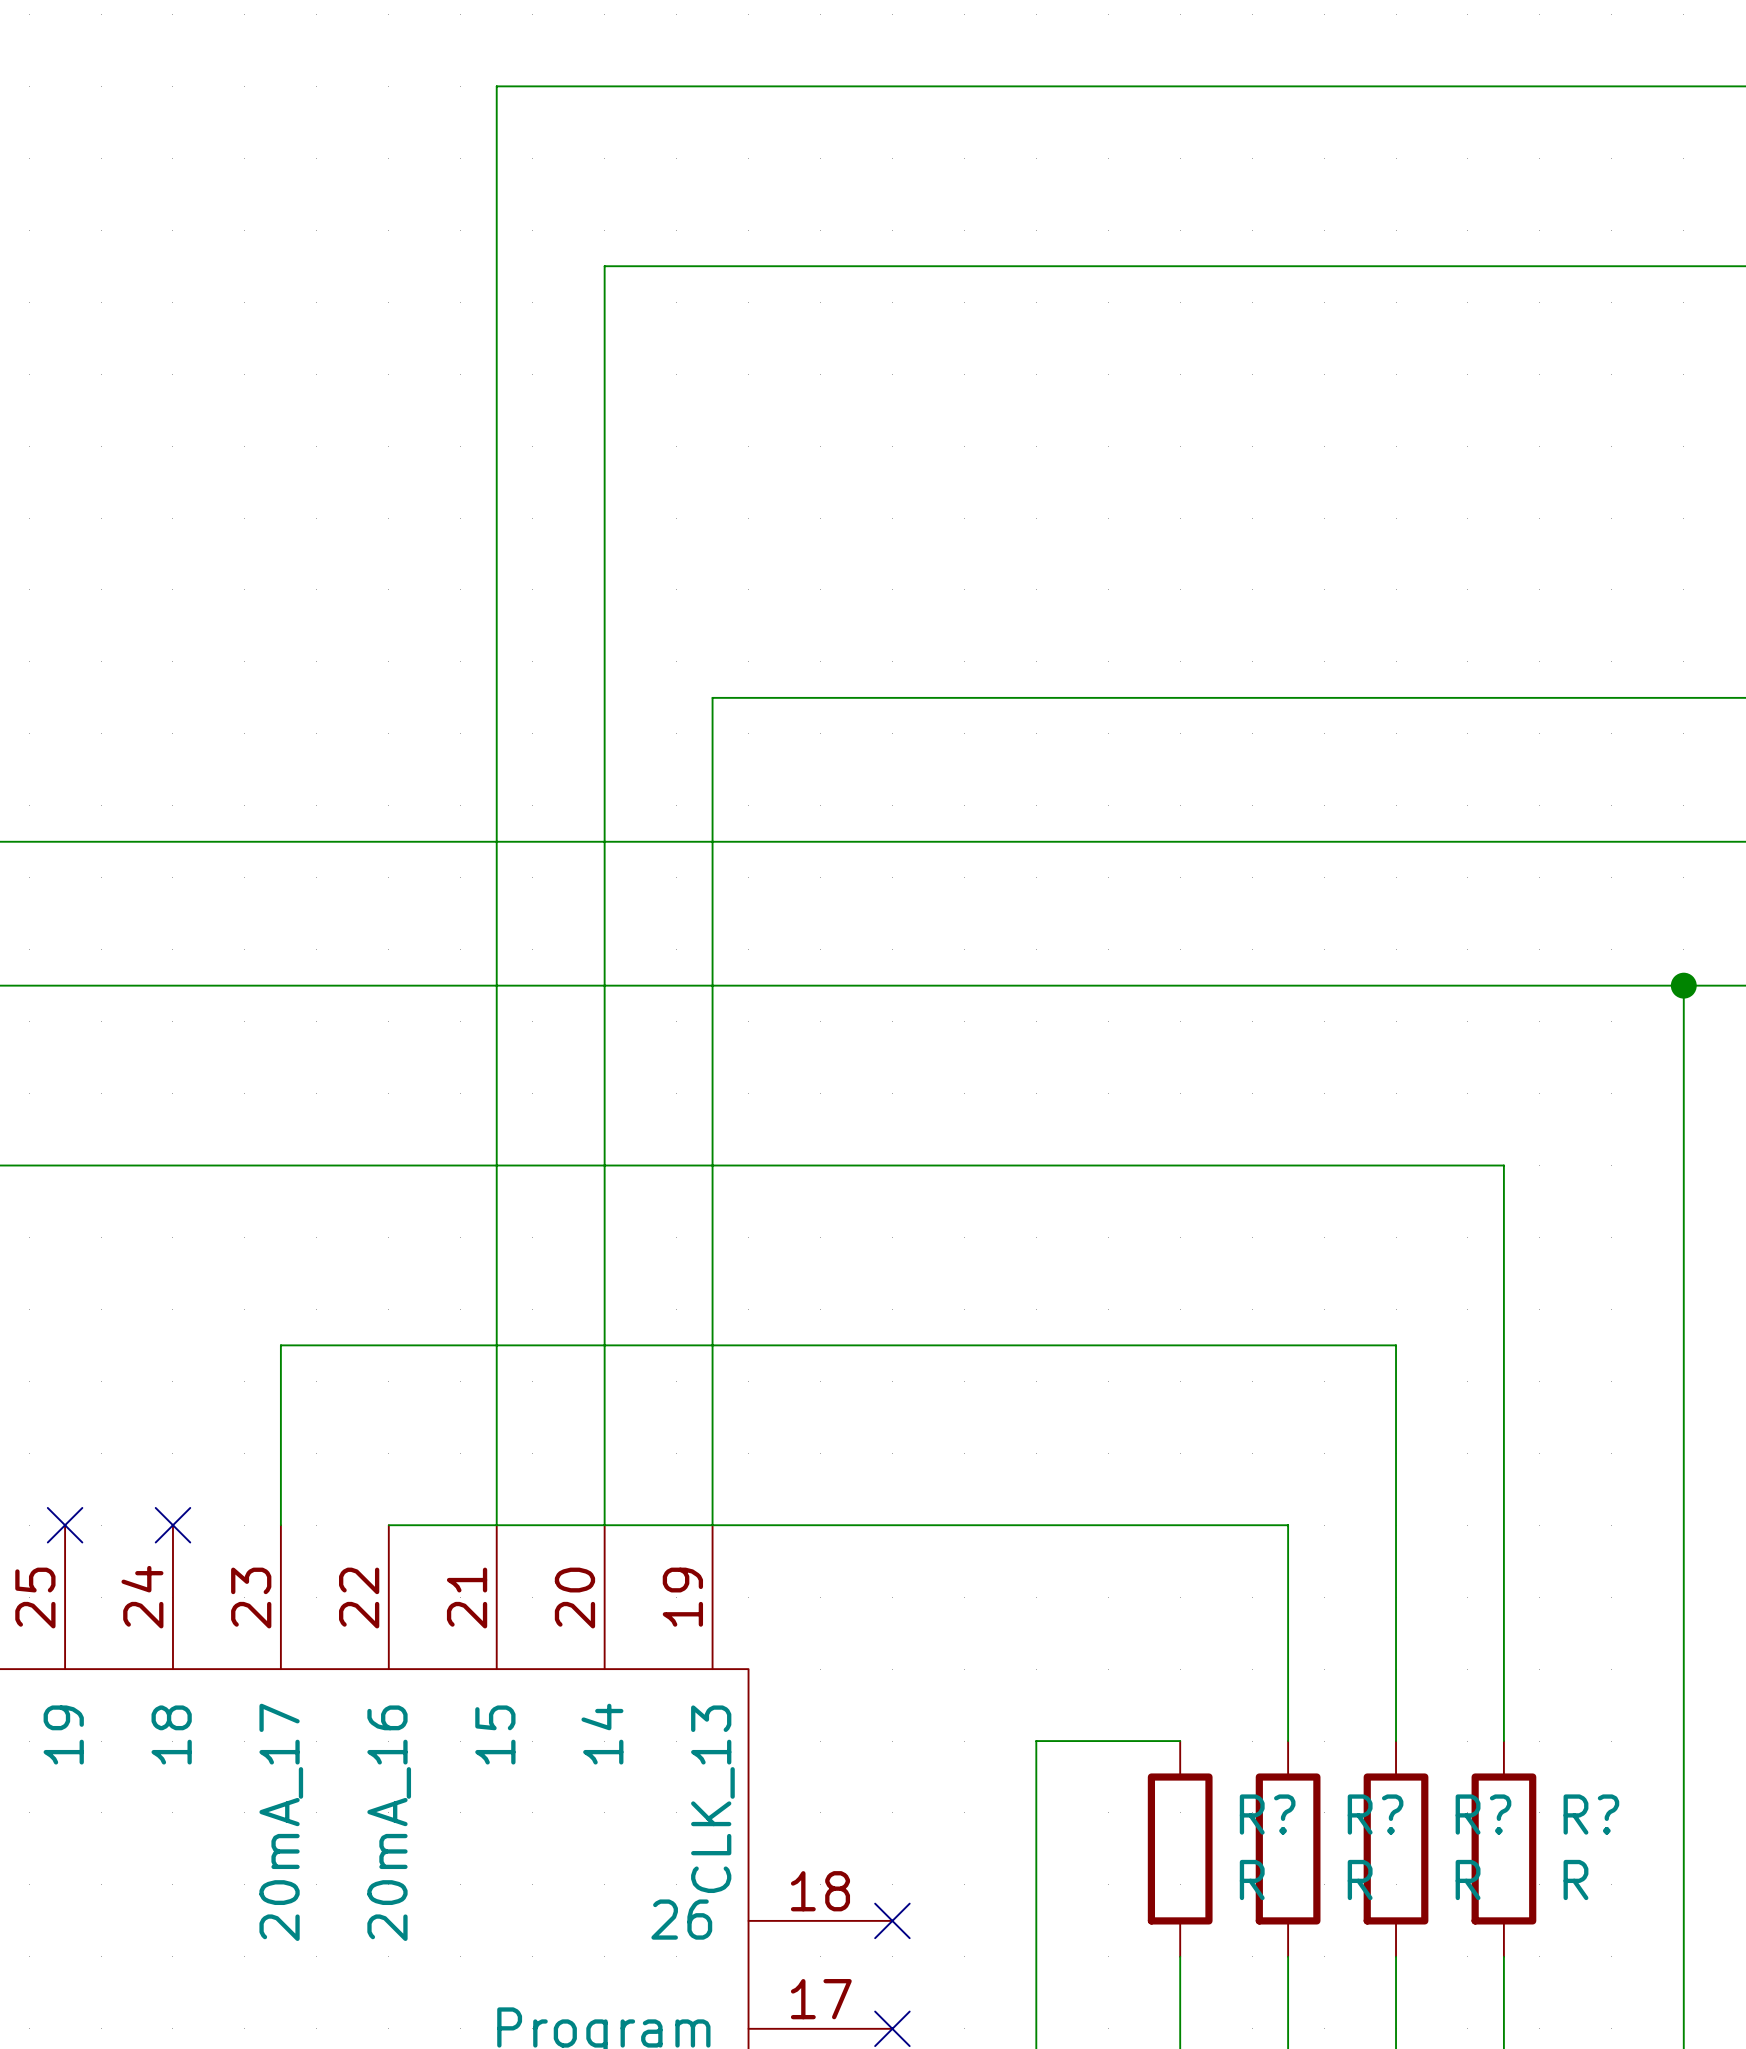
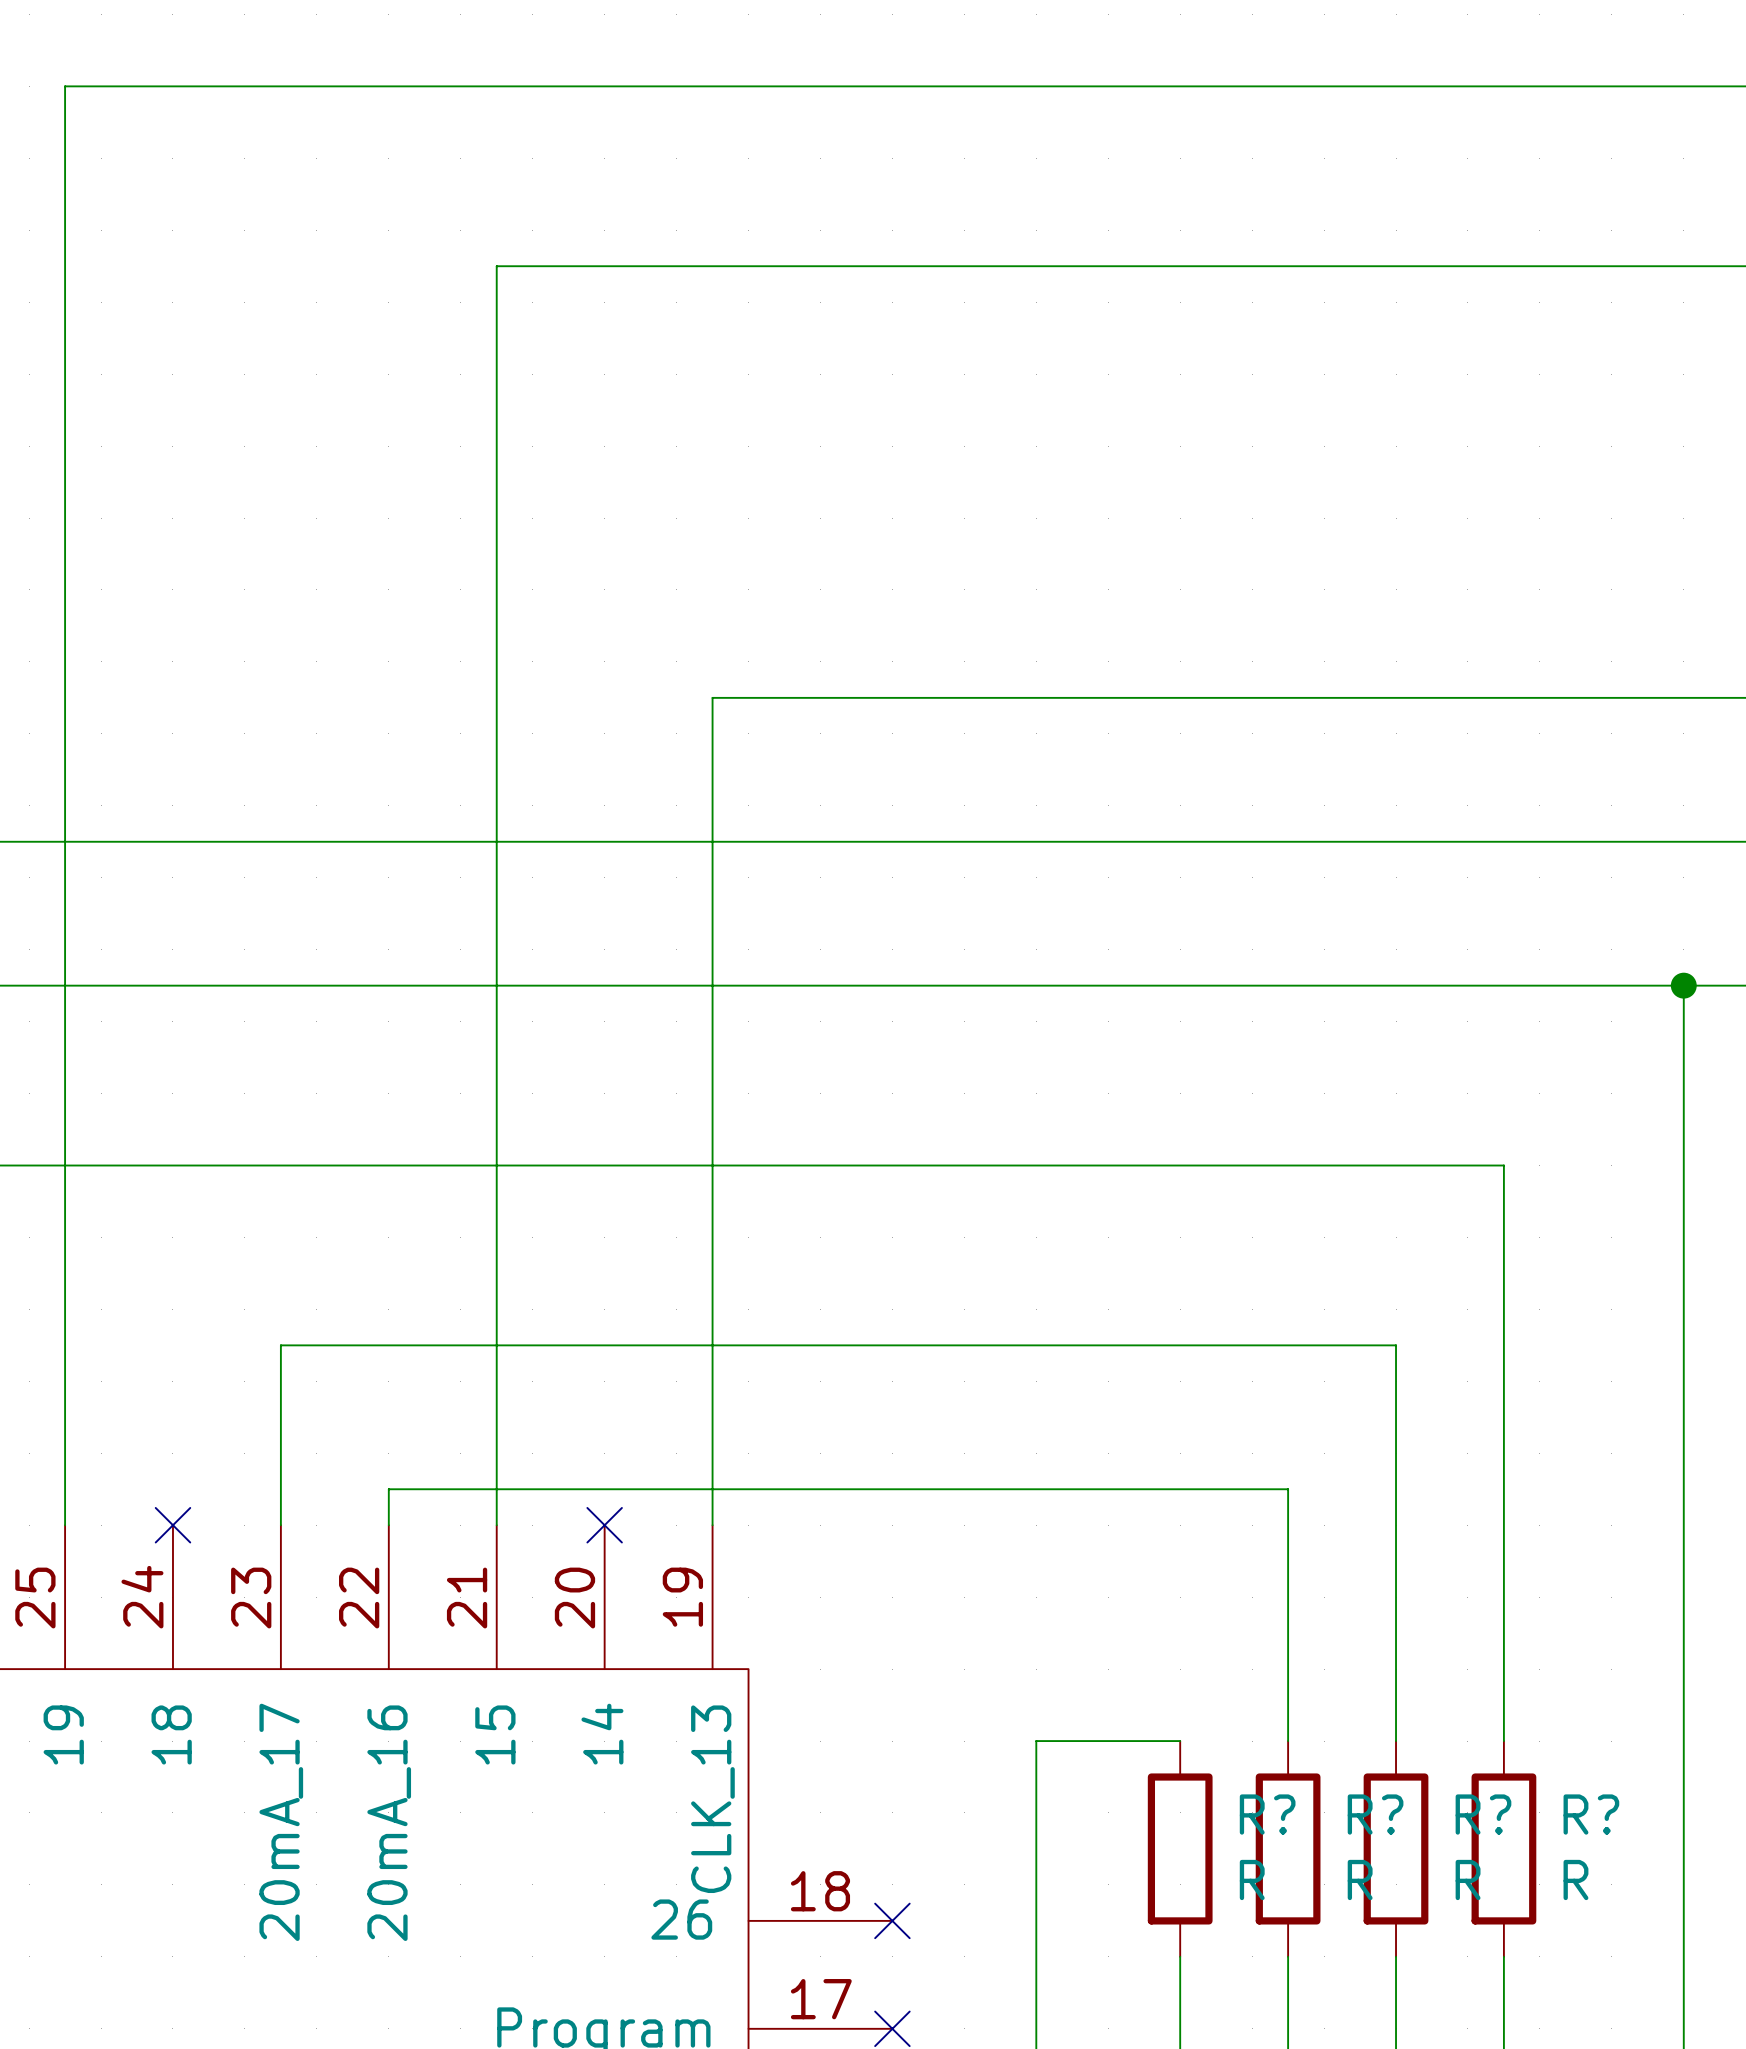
wire: (496, 86) (496, 266) -> (604, 266) (496, 266)
wire: none -> (496, 86) (65, 86) (65, 1525)
wire: (604, 266) (604, 1525) -> none
no-connect mark: (65, 1525) -> none
wire: (388, 1525) (1288, 1525) -> (388, 1525) (388, 1489) (1288, 1489) (1288, 1525)
no-connect mark: none -> (604, 1525)

